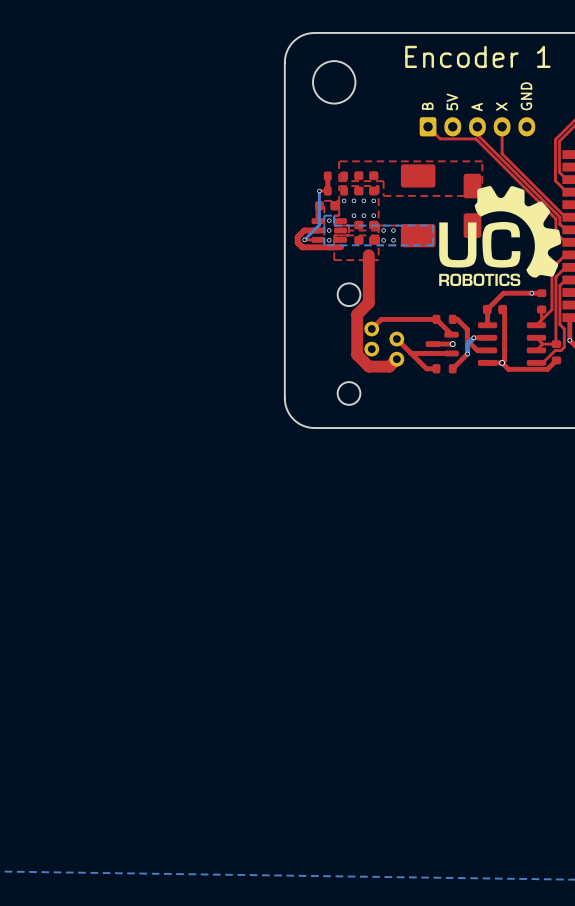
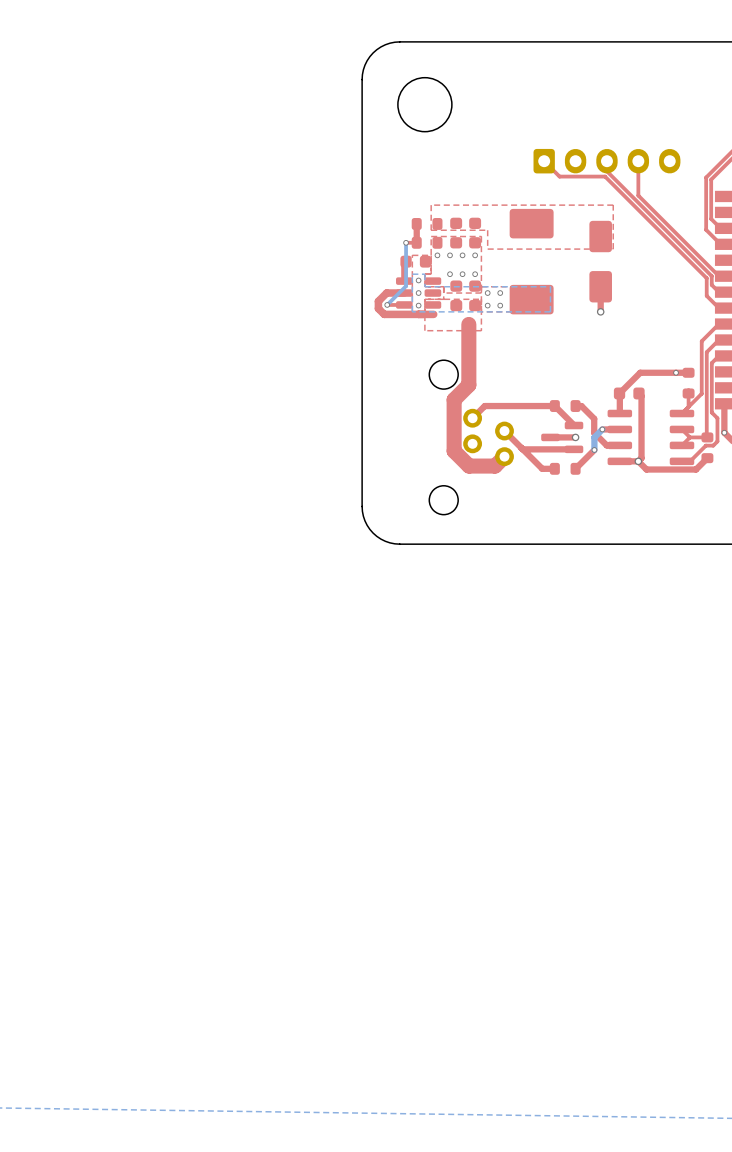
text: Encoder 1 (477, 56) -> none
text: GND (526, 96) -> none
text: 5V (452, 101) -> none
text: B (427, 106) -> none
text: X (501, 106) -> none
text: A (477, 107) -> none
drawing: [439, 186, 562, 287] -> none

